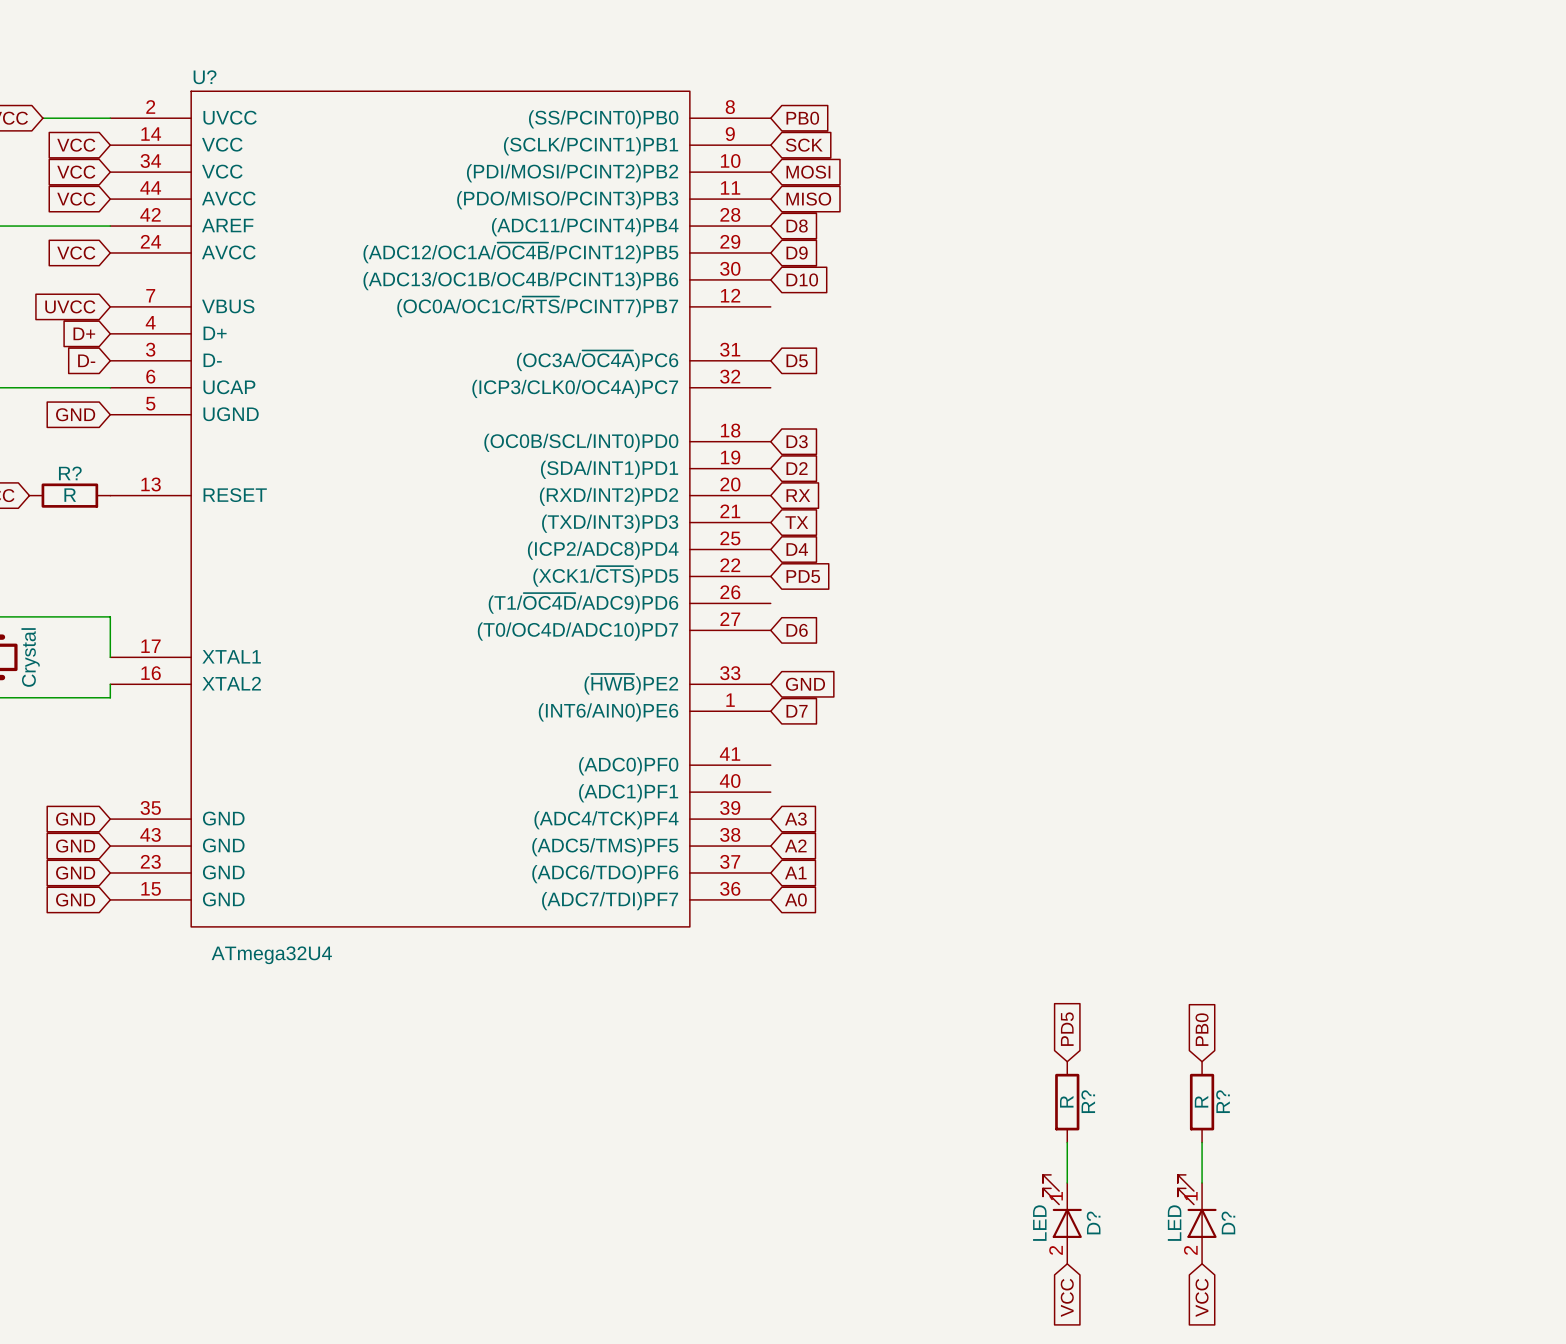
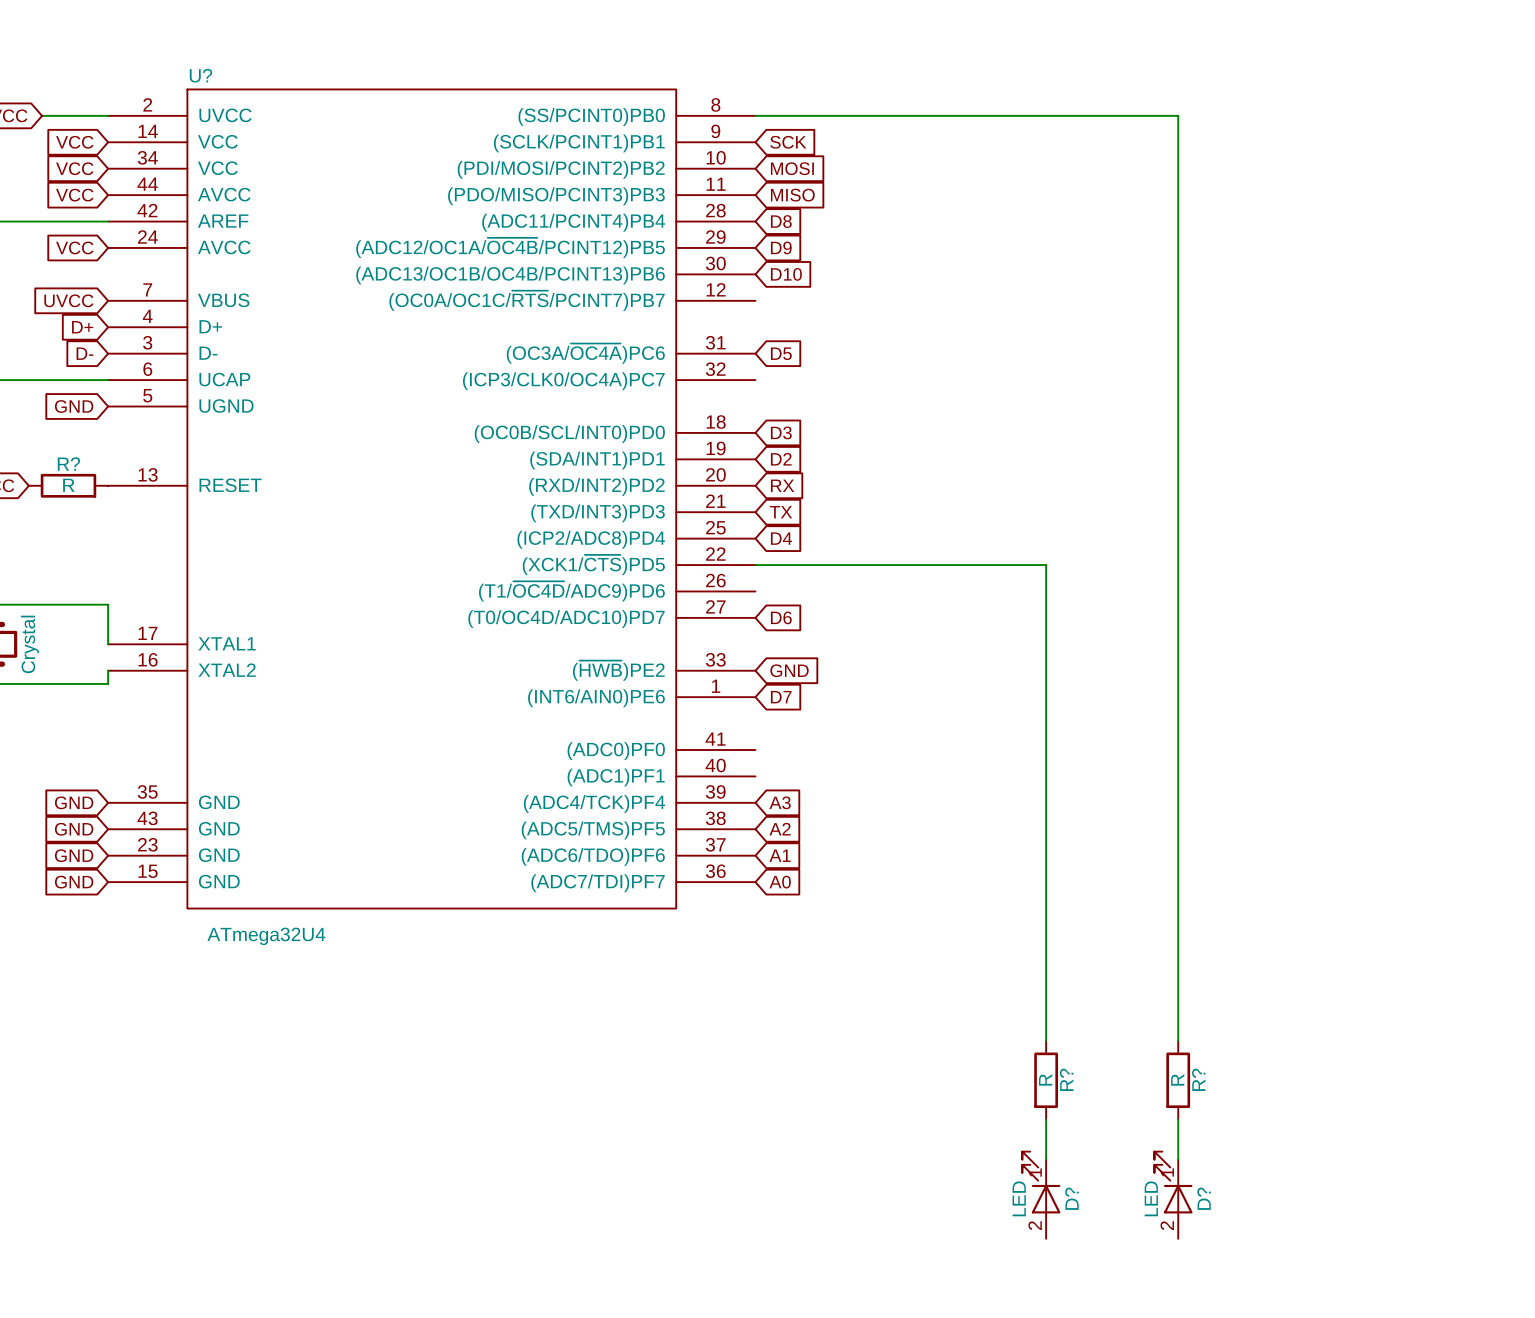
wire: none -> (755, 115) (1178, 115) (1178, 1040)
global label: PB0 (802, 118) -> none
wire: none -> (755, 565) (1046, 565) (1046, 1040)
global label: PD5 (803, 576) -> none
global label: PD5 (1067, 1029) -> none
global label: PB0 (1202, 1029) -> none
global label: VCC (1067, 1297) -> none
global label: VCC (1202, 1297) -> none

